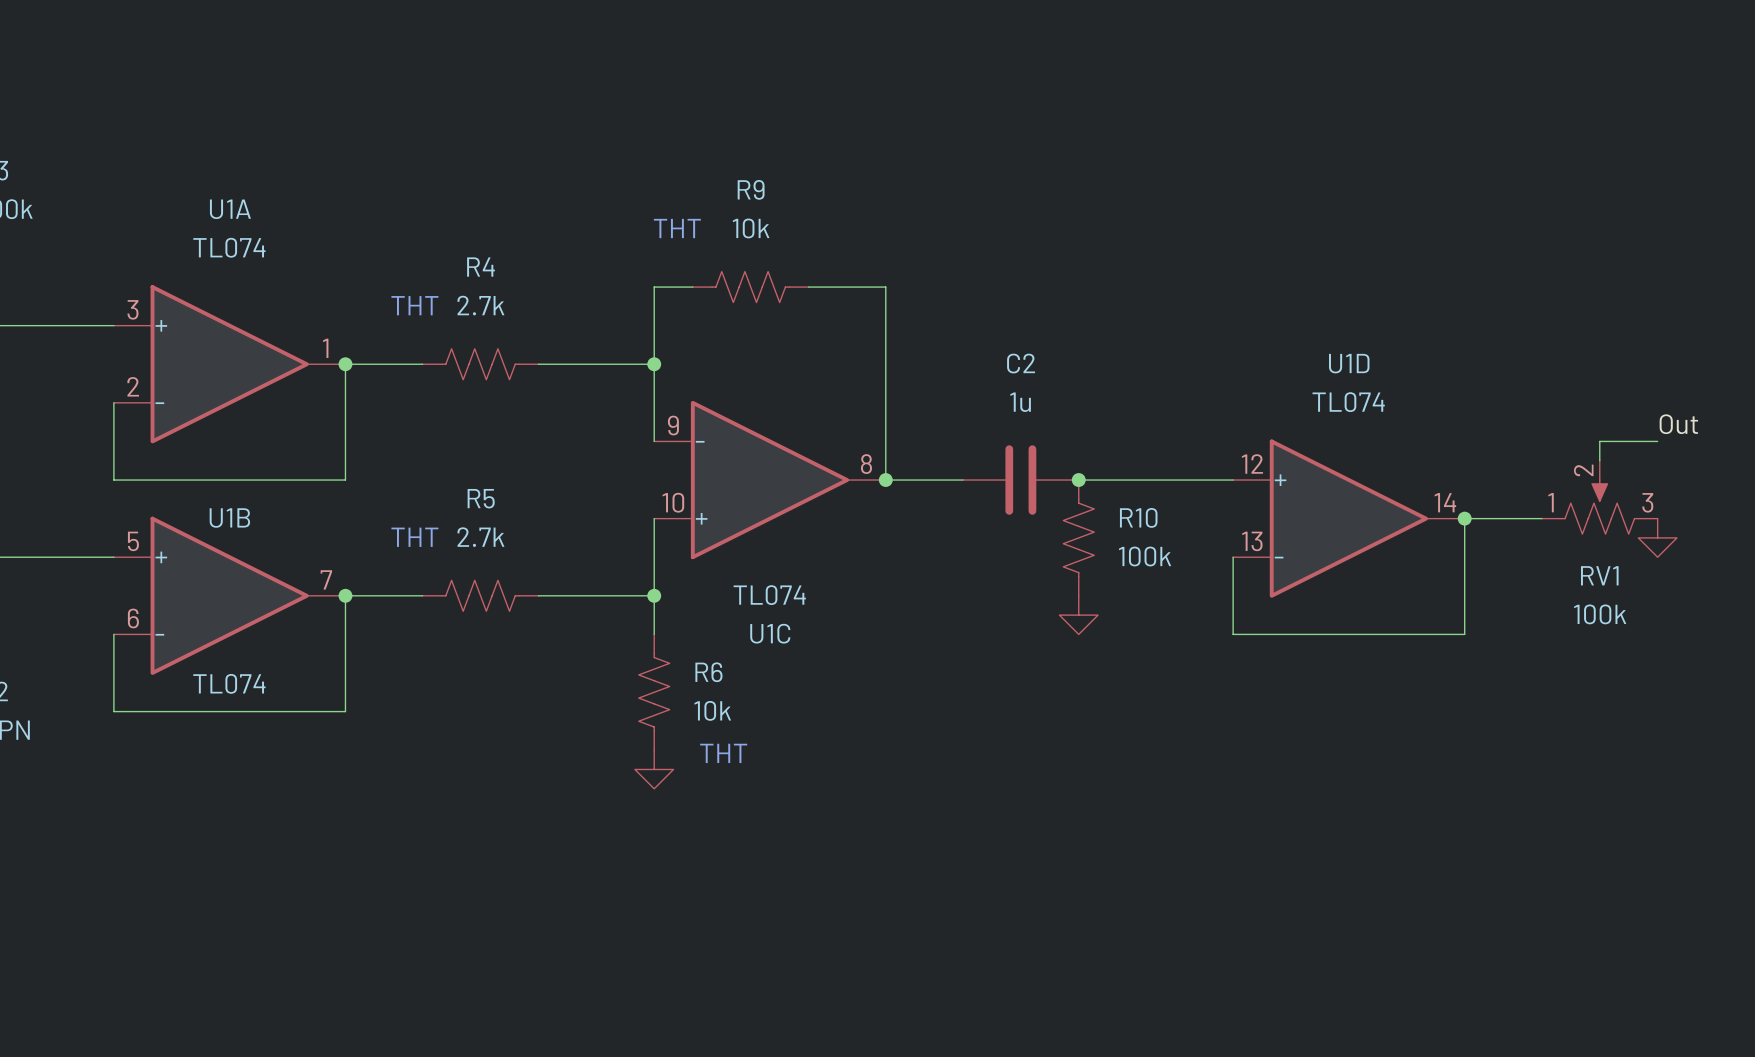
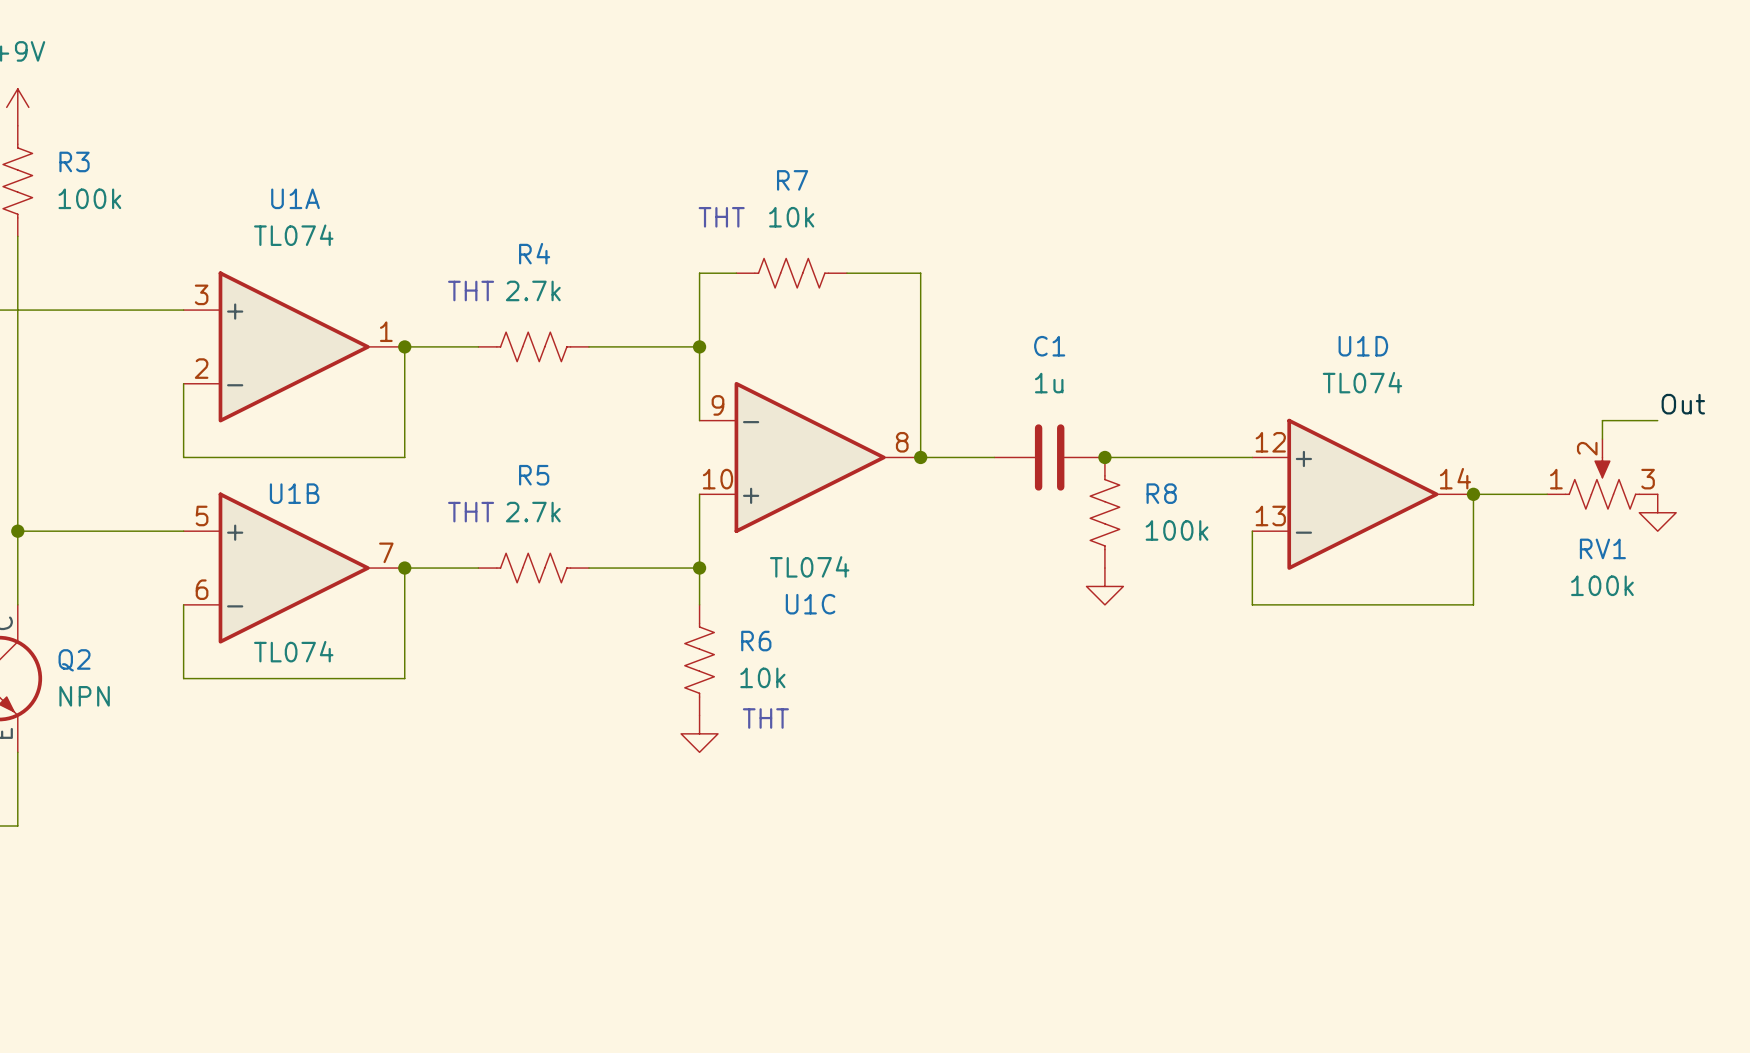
R9 name: R9 (751, 189) -> R7 (792, 180)
C2 name: C2 (1021, 363) -> C1 (1049, 346)
R10 name: R10 (1138, 517) -> R8 (1161, 493)

